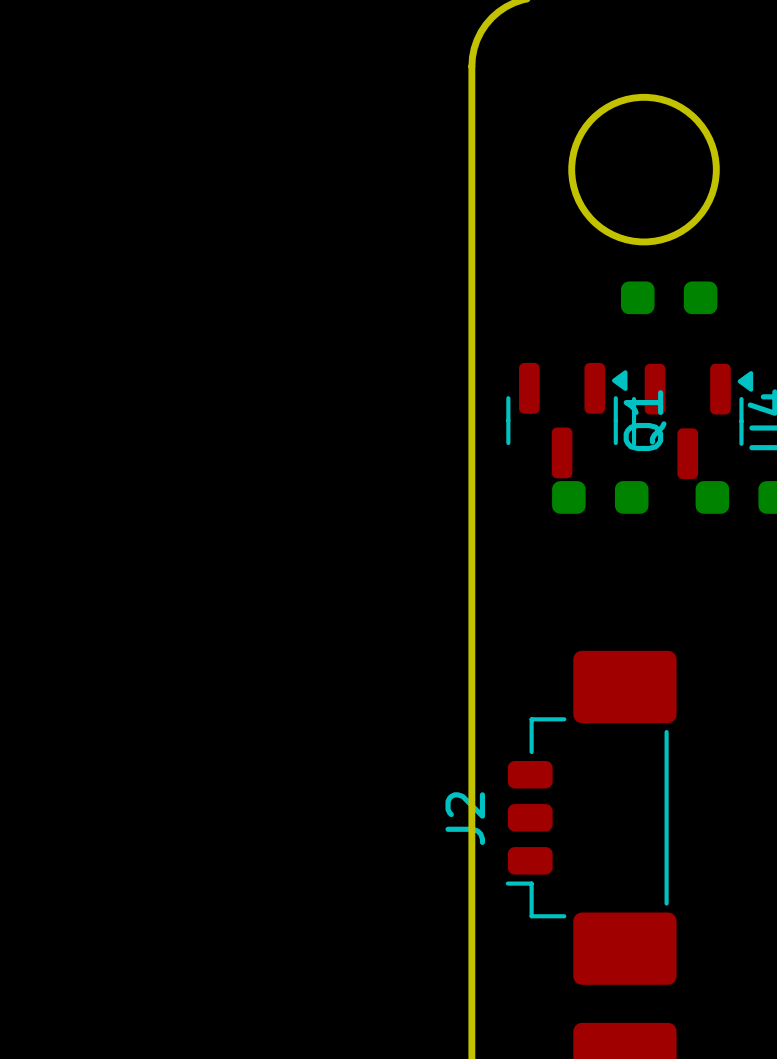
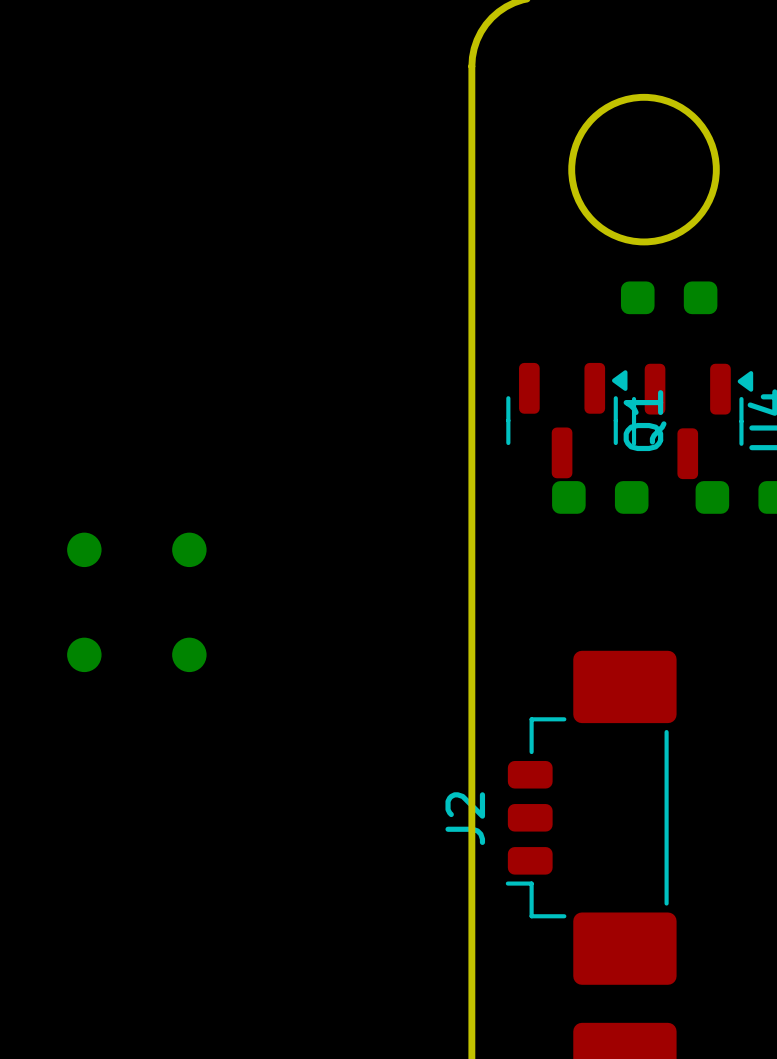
part: none -> (84, 549)
part: none -> (189, 549)
part: none -> (84, 654)
part: none -> (189, 654)

